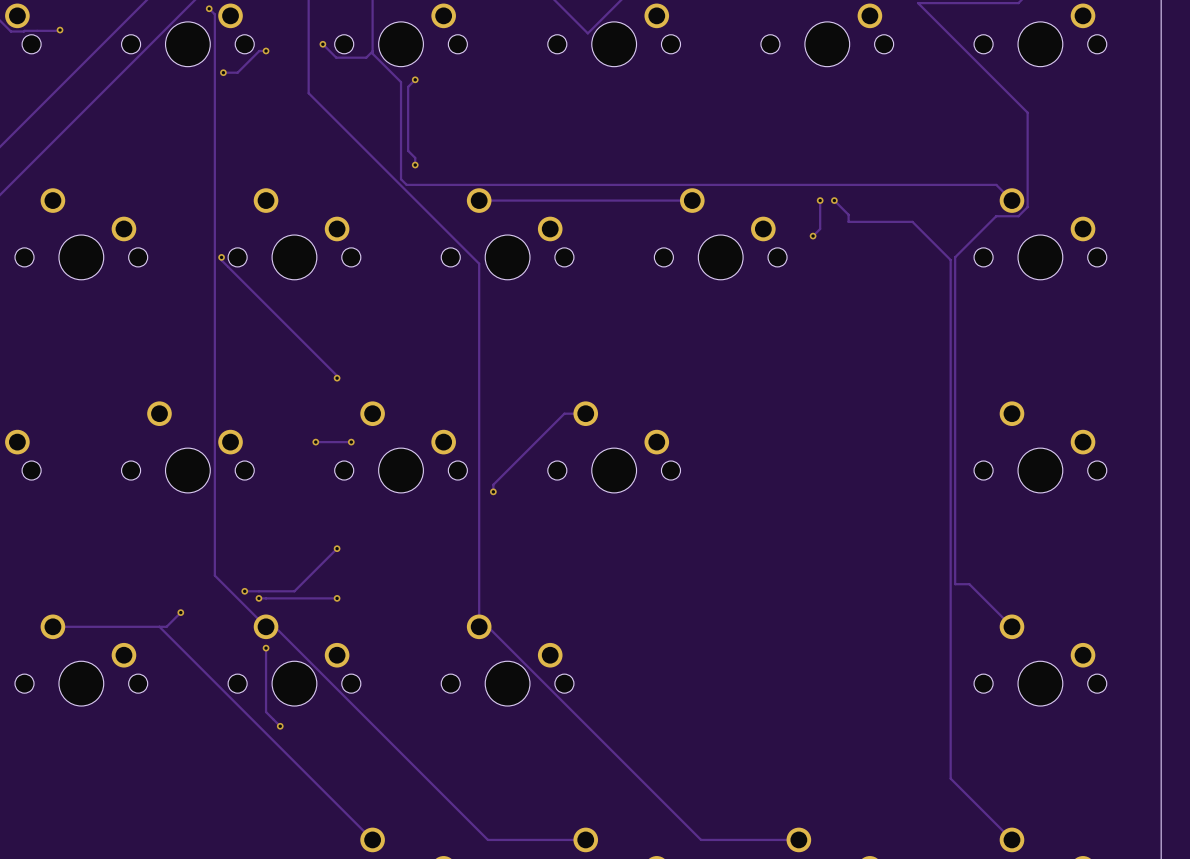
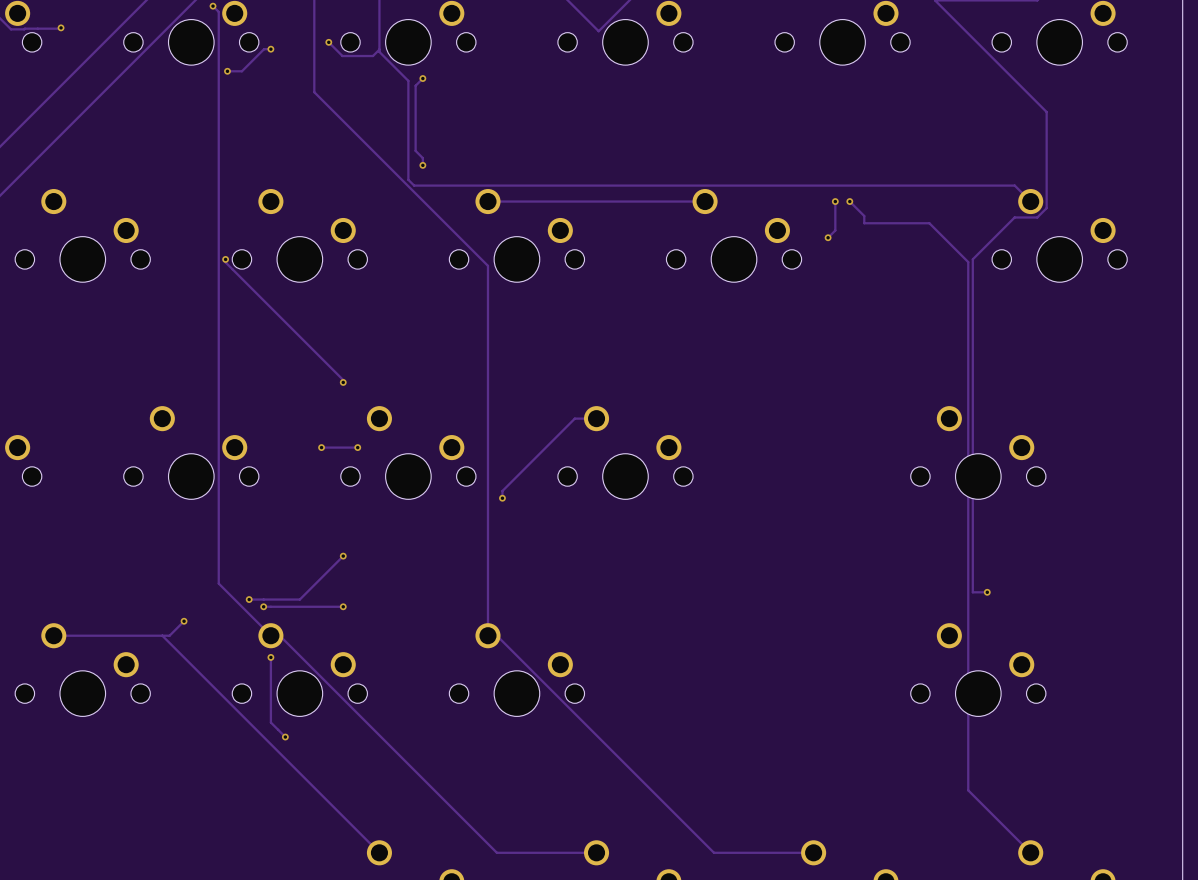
part position: (1040, 447) -> (978, 452)
track: (969, 584) (1011, 626) -> none
via: none -> (987, 592)
part position: (1040, 660) -> (978, 669)

